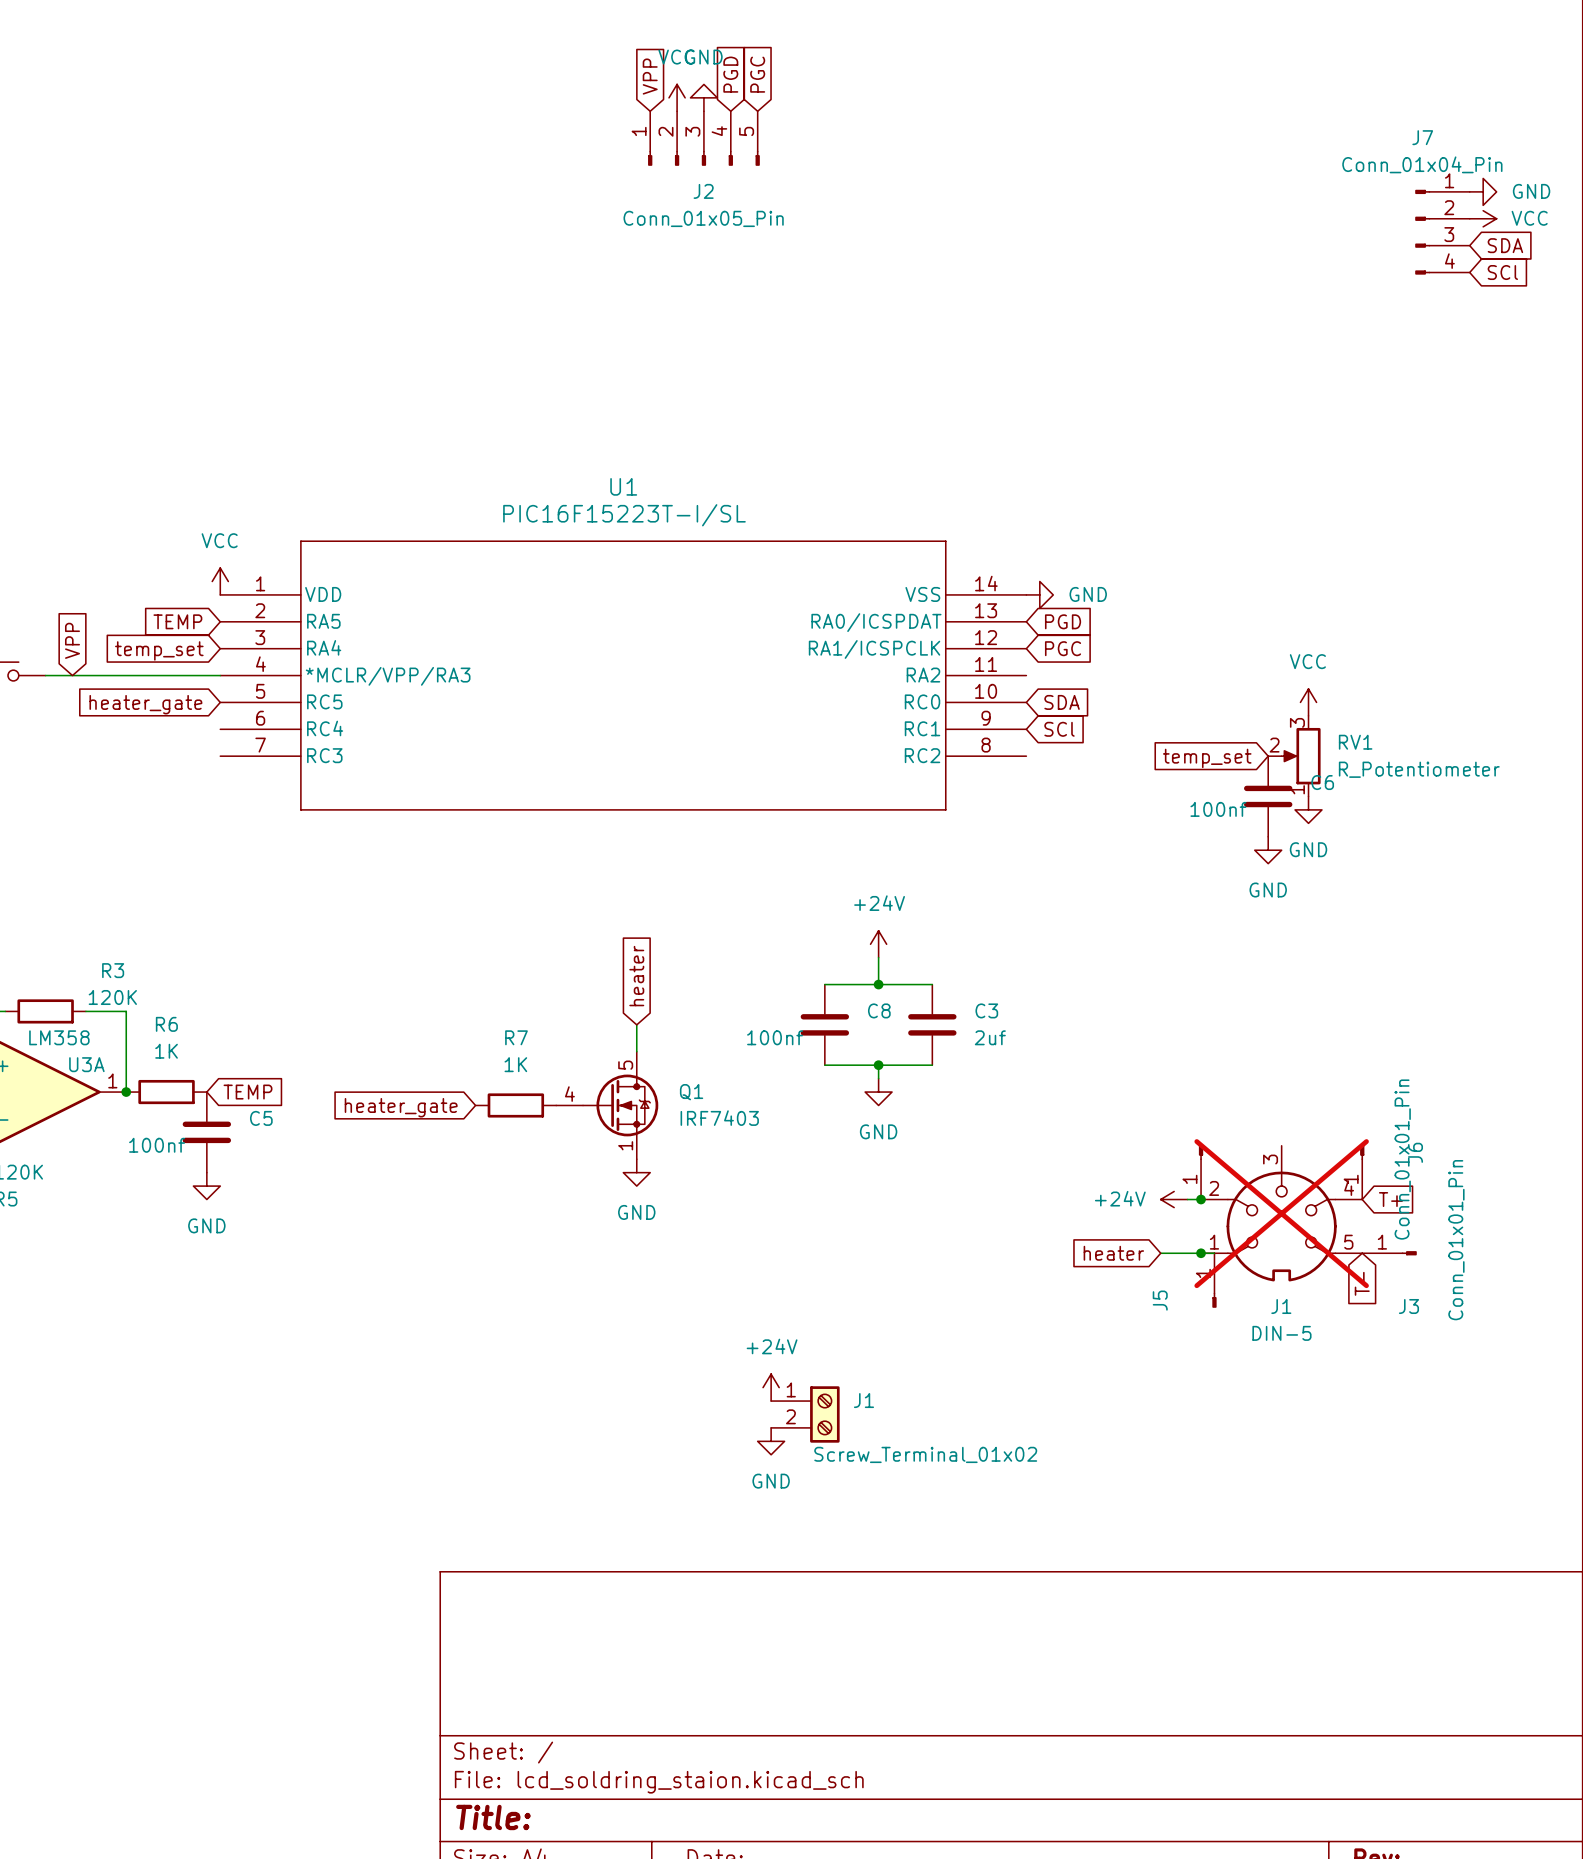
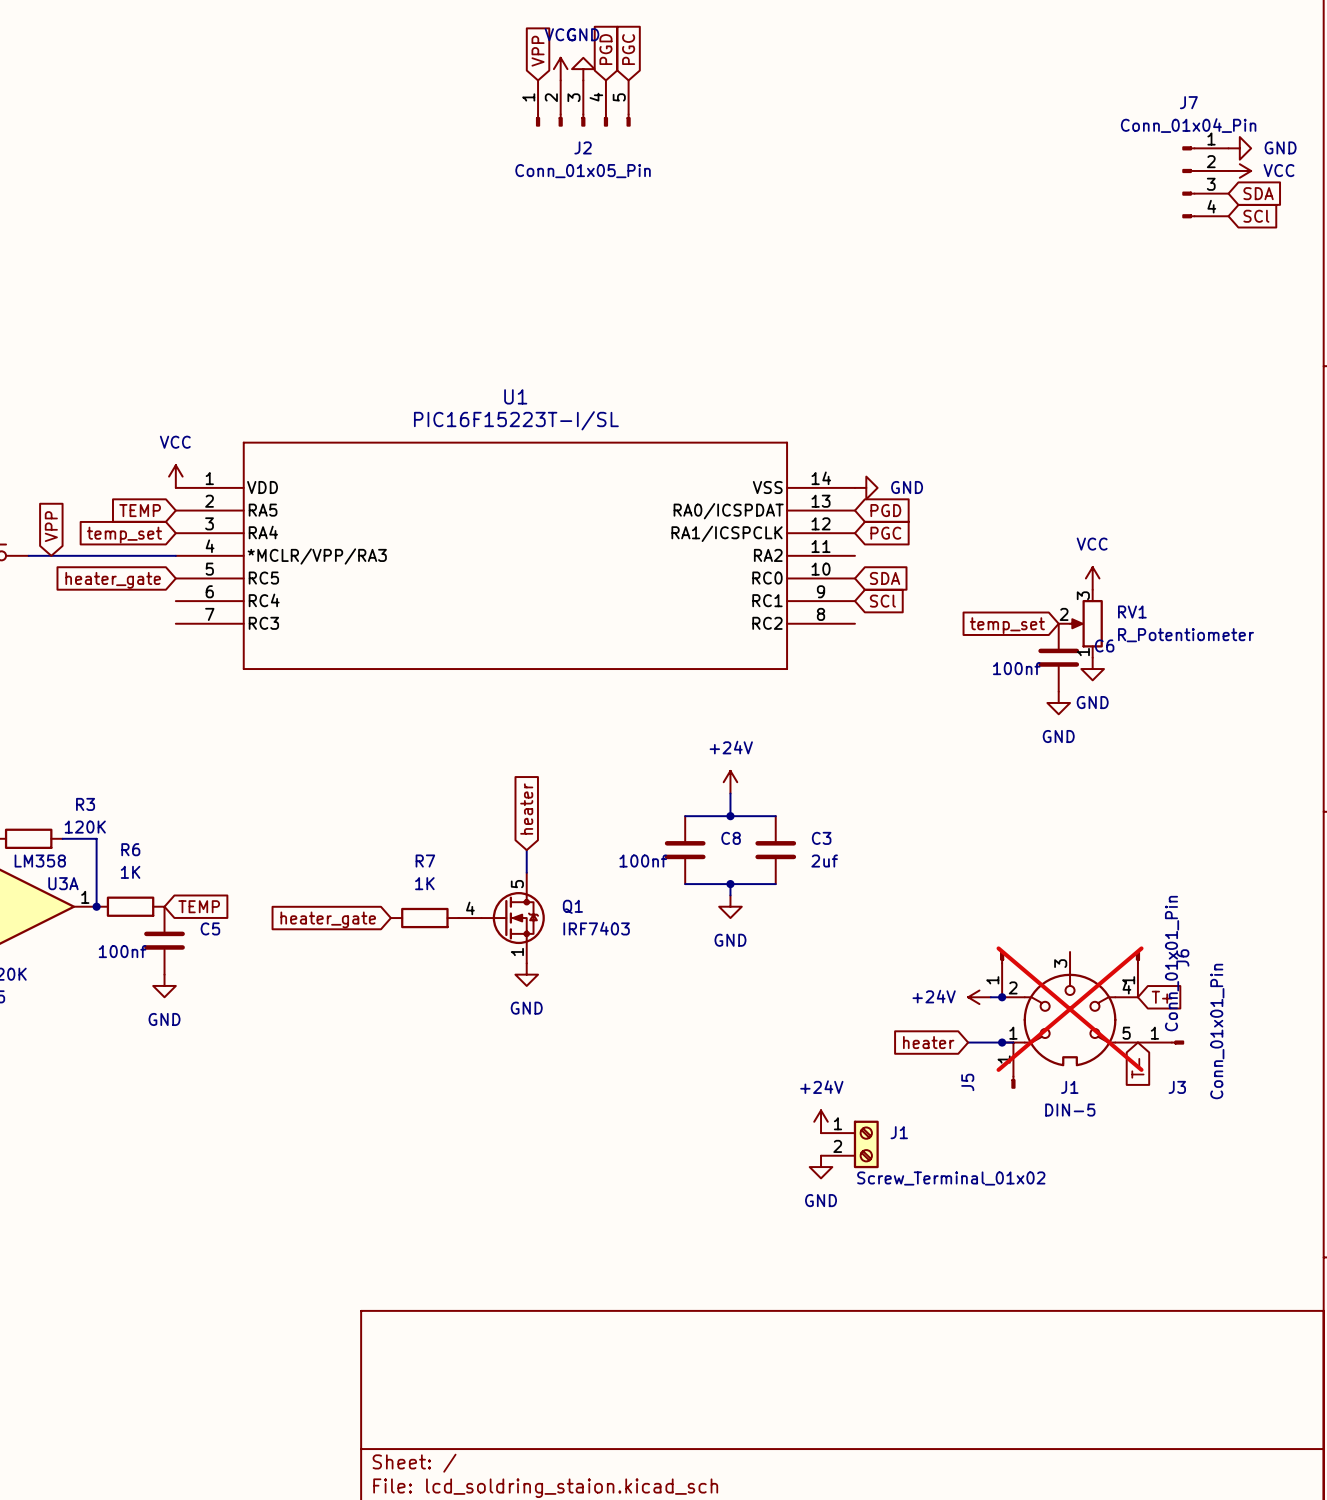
power symbol position: +24V (771, 1387) -> +24V (821, 1121)
J1 position: (805, 1414) -> (849, 1144)
power symbol position: GND (771, 1441) -> GND (821, 1167)

